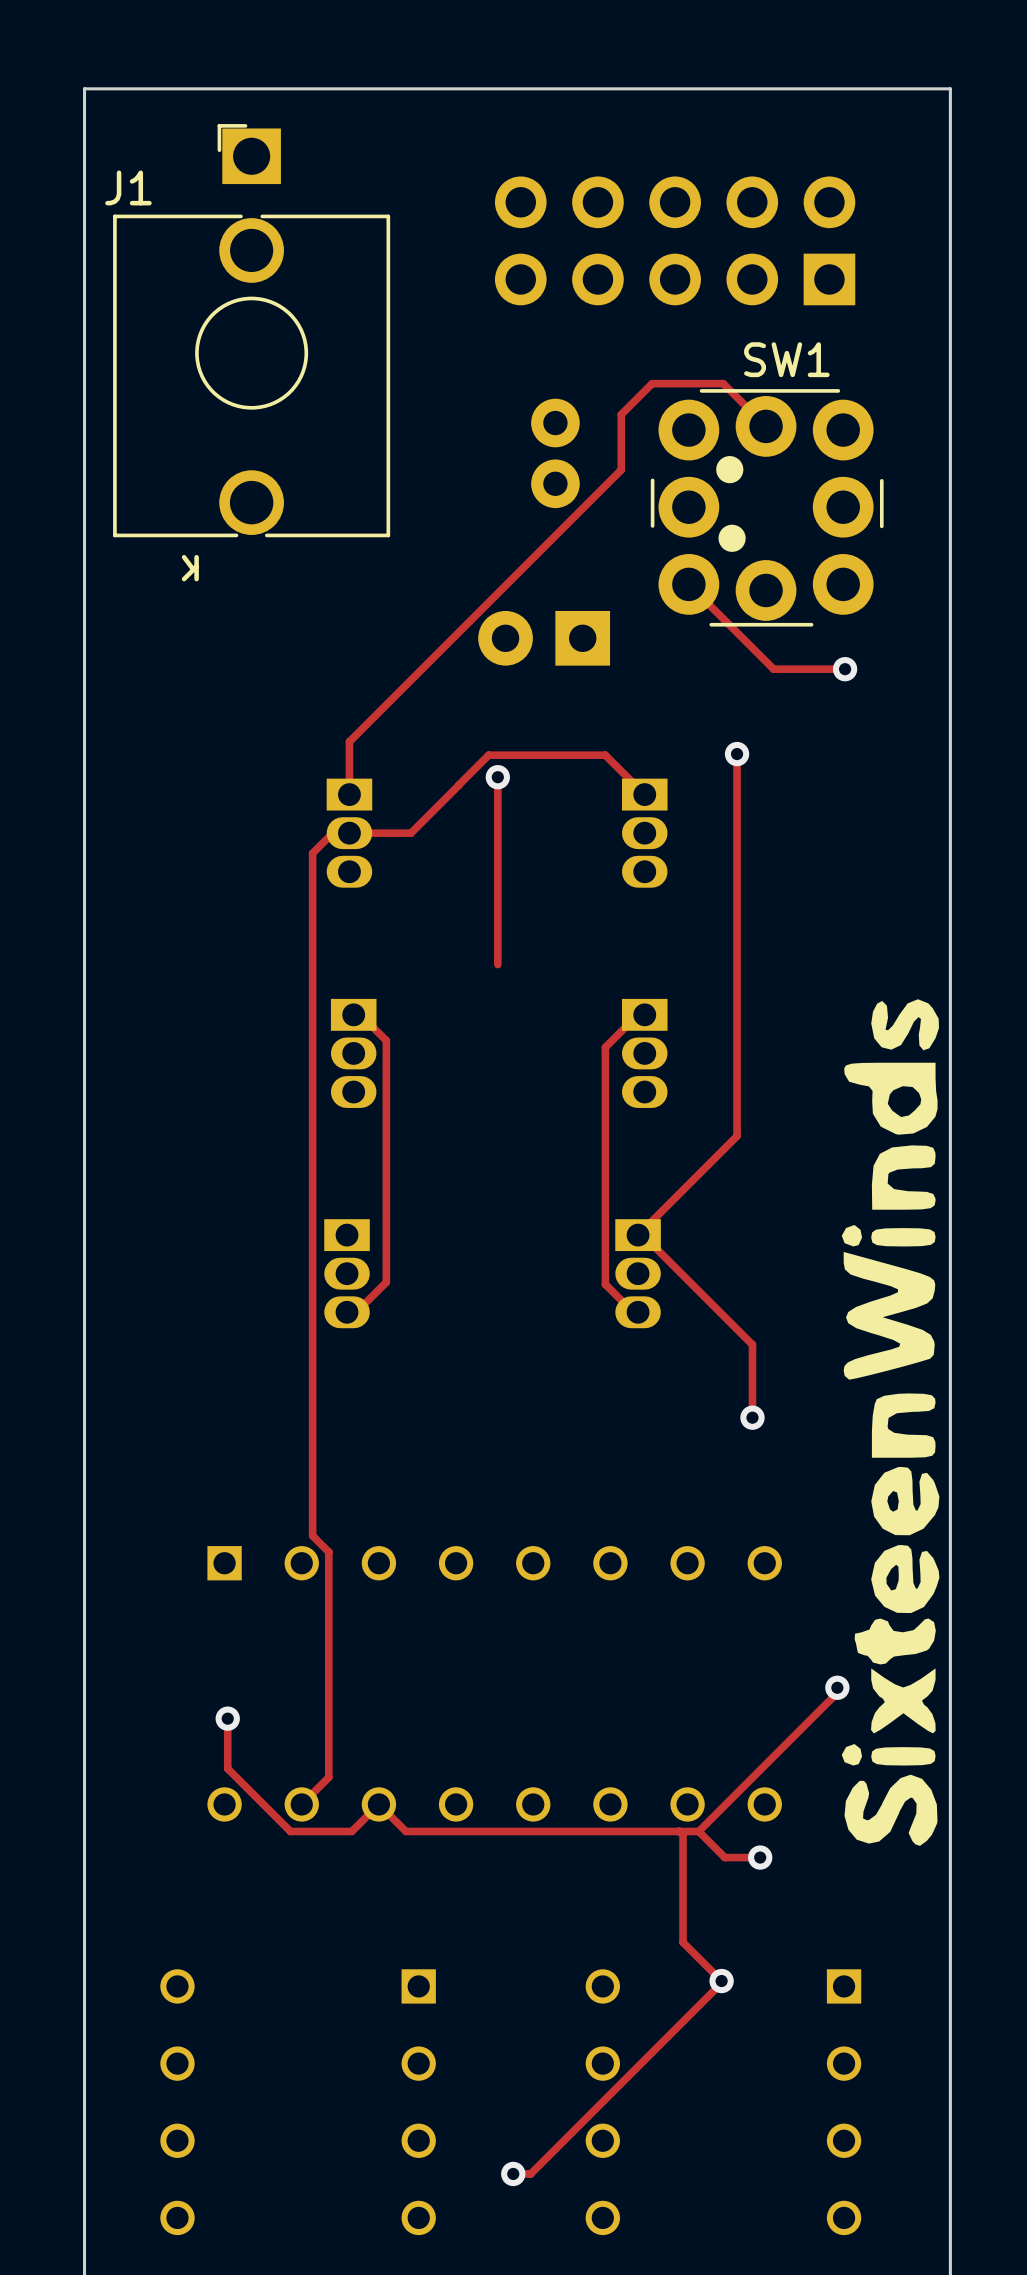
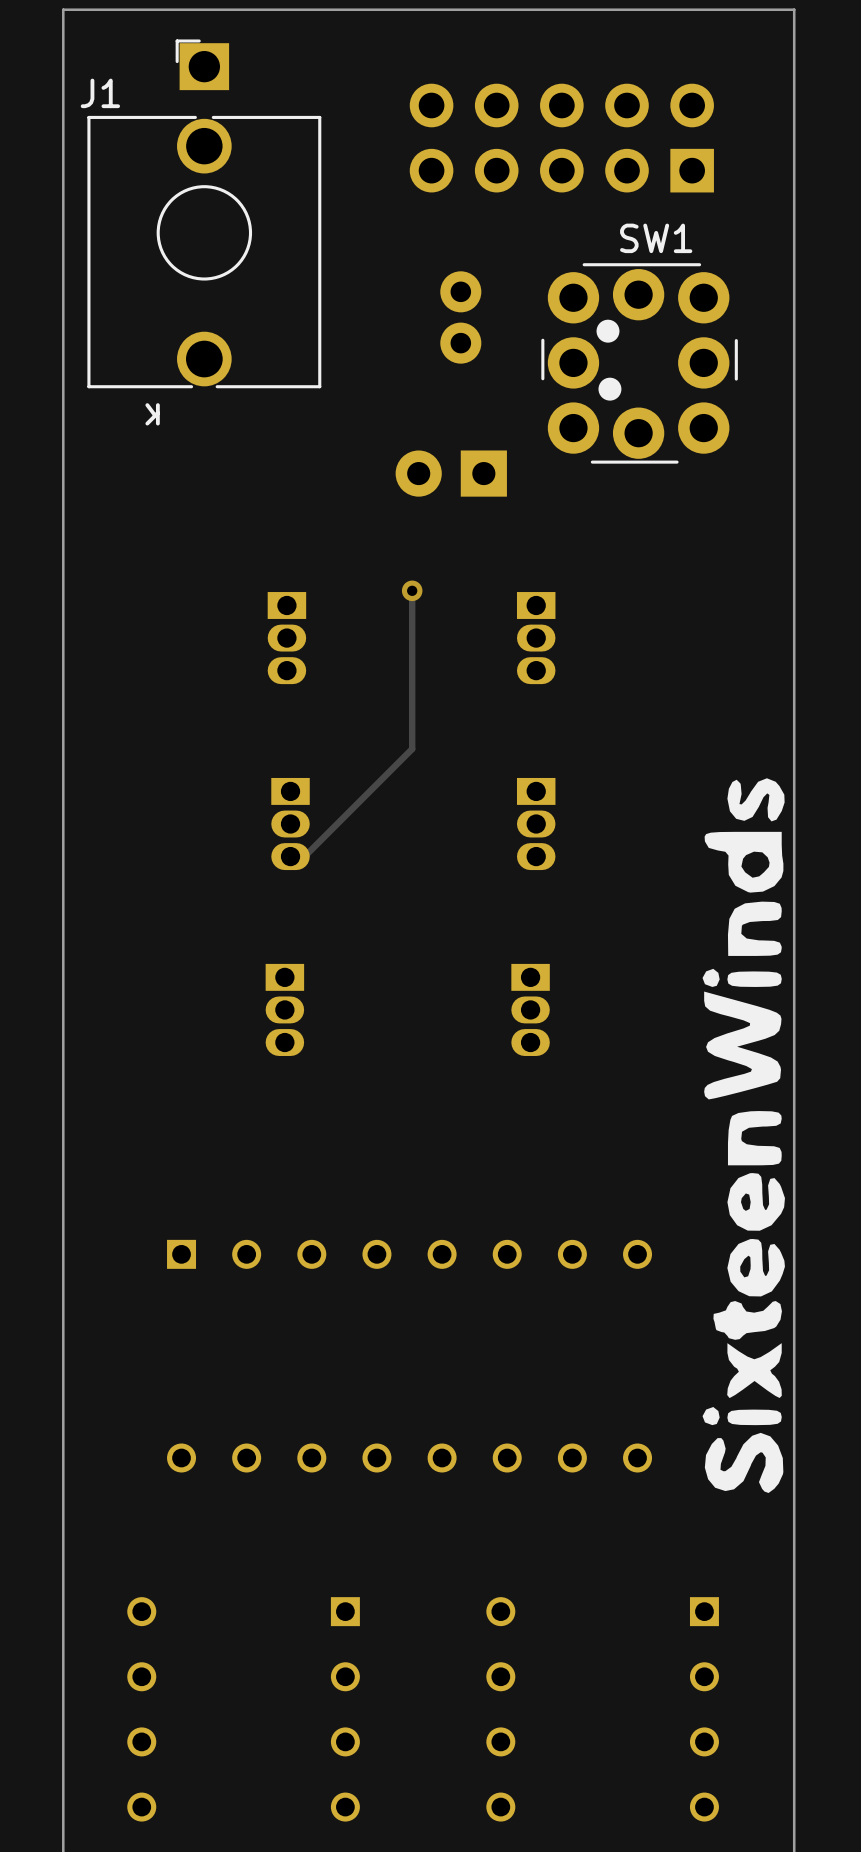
track: (766, 426) (723, 383) (652, 383) (621, 414) (621, 469) (349, 741) (349, 794) -> none
track: (688, 584) (773, 669) (845, 669) -> none
via: (845, 669) -> none
track: (737, 754) (737, 1136) (638, 1235) (642, 1235) (752, 1344) (752, 1417) -> none
via: (737, 754) -> none
track: (644, 794) (605, 755) (488, 755) (411, 833) (332, 833) (312, 853) (312, 1535) (328, 1552) (328, 1777) (301, 1804) -> none
track: none -> (412, 749) (304, 856) (290, 856)
track: (353, 1014) (360, 1014) (386, 1040) (386, 1282) (356, 1312) (347, 1312) -> none
track: (644, 1014) (637, 1014) (605, 1047) (605, 1284) (633, 1312) (638, 1312) -> none
via: (752, 1417) -> none
track: (837, 1687) (837, 1692) (698, 1831) -> none
via: (837, 1687) -> none
track: (227, 1718) (227, 1768) (290, 1831) (351, 1831) (378, 1804) (405, 1831) (698, 1831) -> none
via: (227, 1718) -> none
track: (680, 1831) (683, 1834) (683, 1942) (721, 1983) (530, 2173) (513, 2173) -> none
track: (698, 1831) (724, 1857) (760, 1857) -> none
via: (760, 1857) -> none
via: (721, 1981) -> none
via: (513, 2173) -> none

